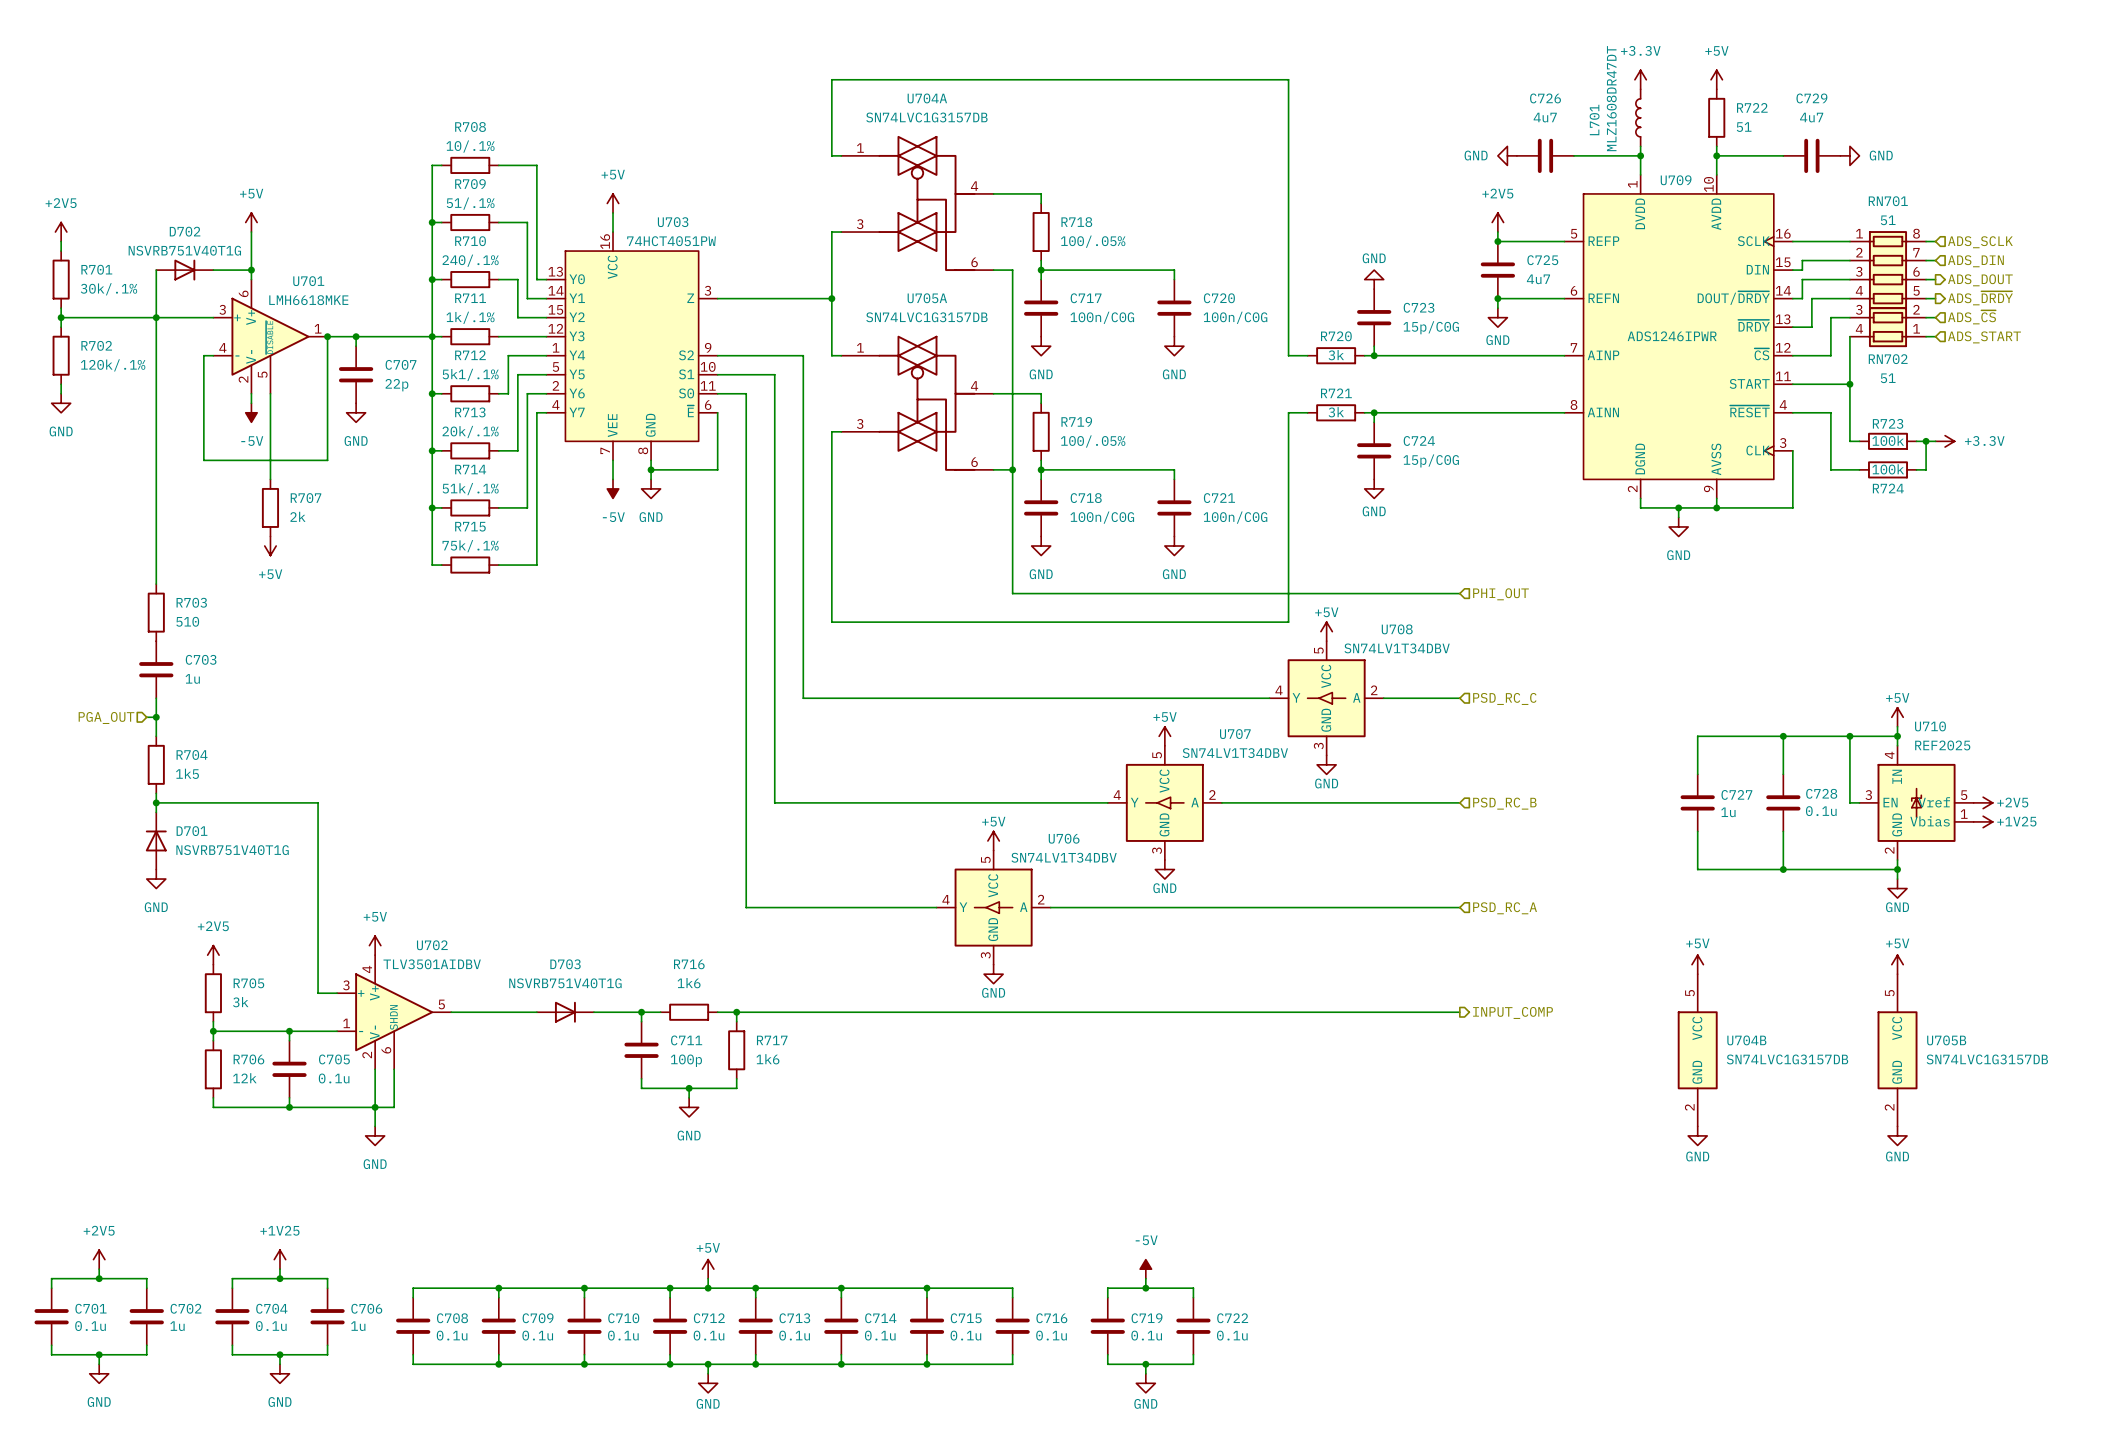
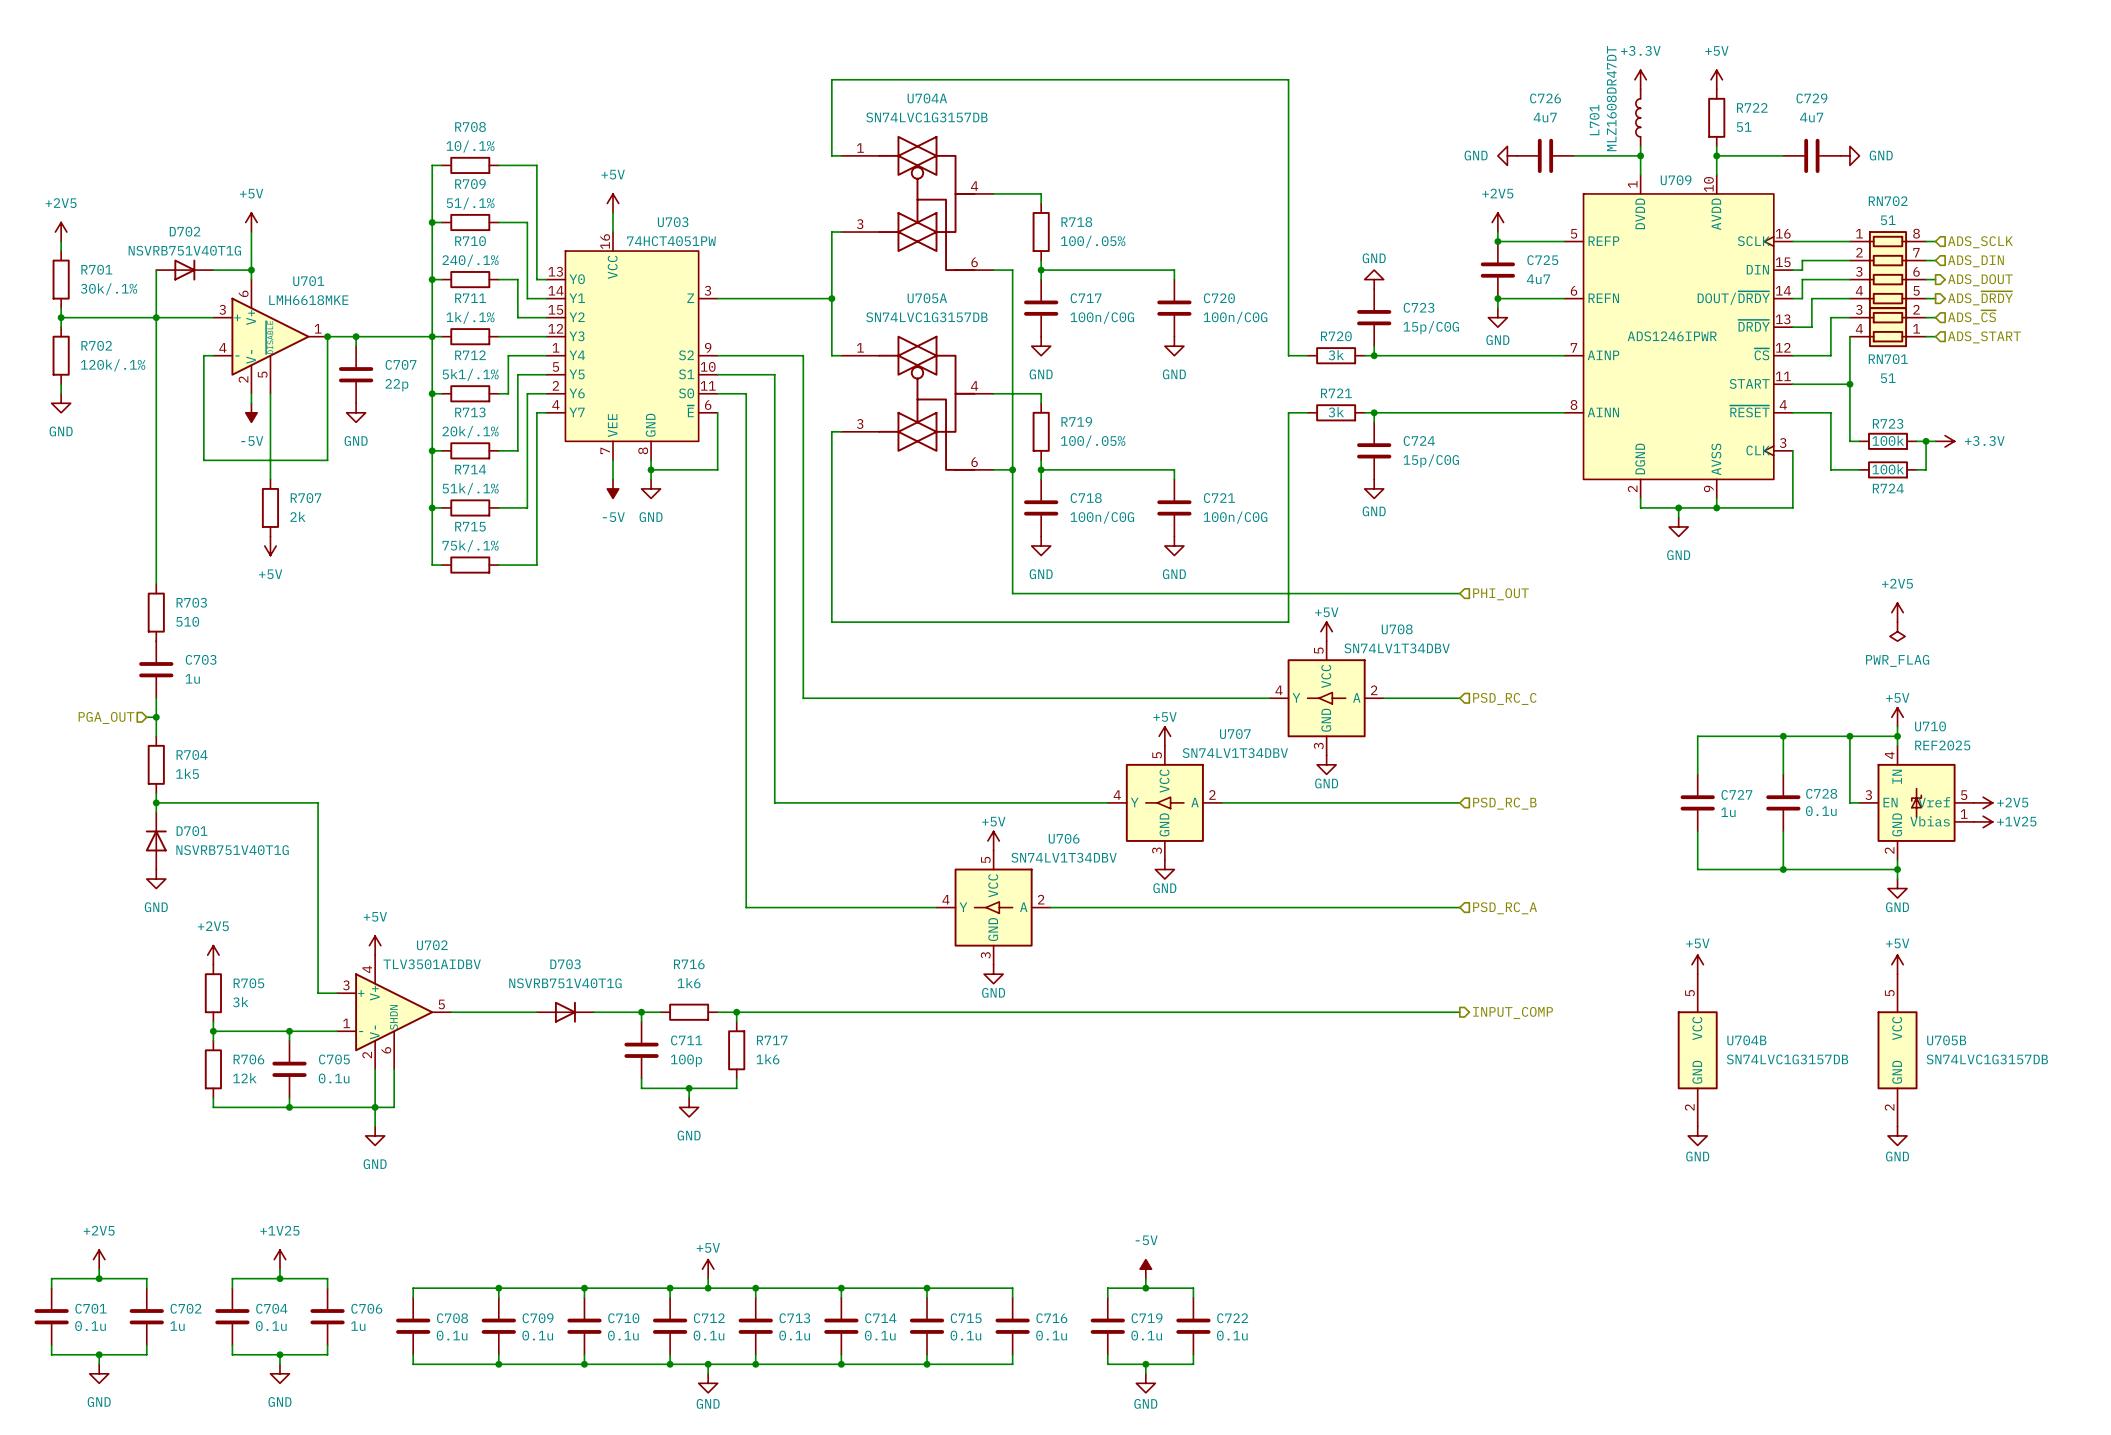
RN701 name: RN701 (1888, 201) -> RN702 (1888, 201)
RN702 name: RN702 (1888, 359) -> RN701 (1888, 359)
power symbol: none -> +2V5 (1897, 612)
power symbol: none -> PWR_FLAG (1897, 631)

